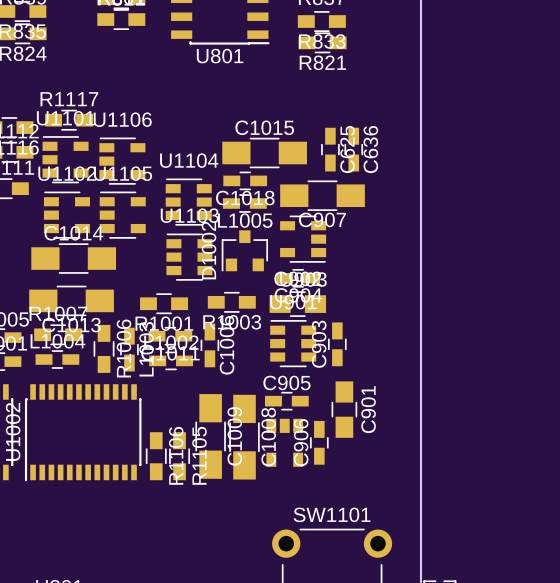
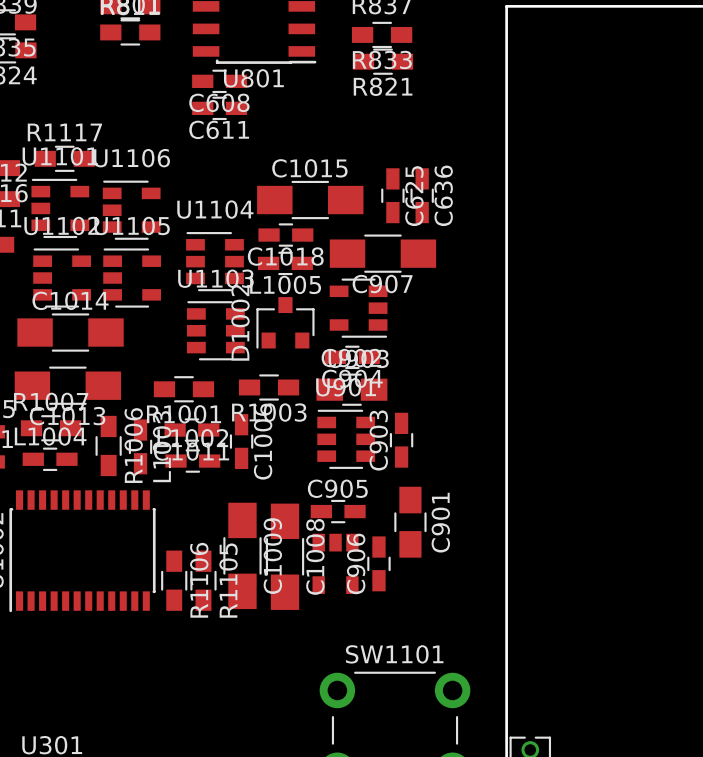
C608: none -> (219, 81)
C611: none -> (219, 108)

